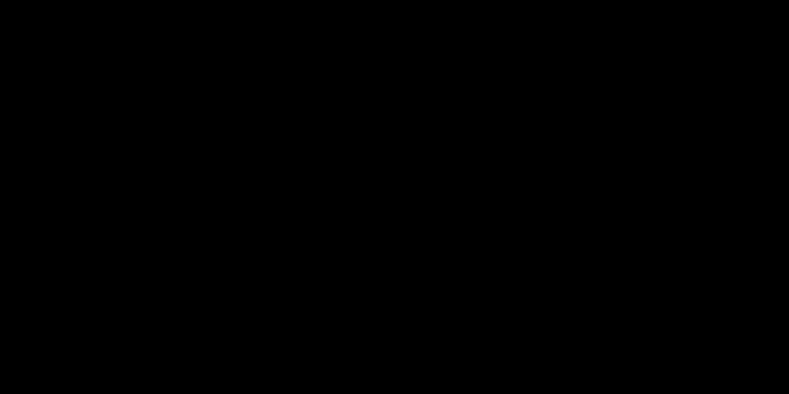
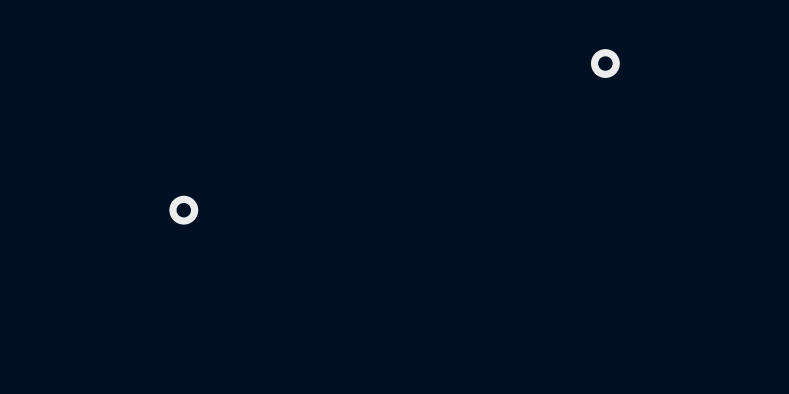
via: none -> (605, 63)
via: none -> (183, 210)

